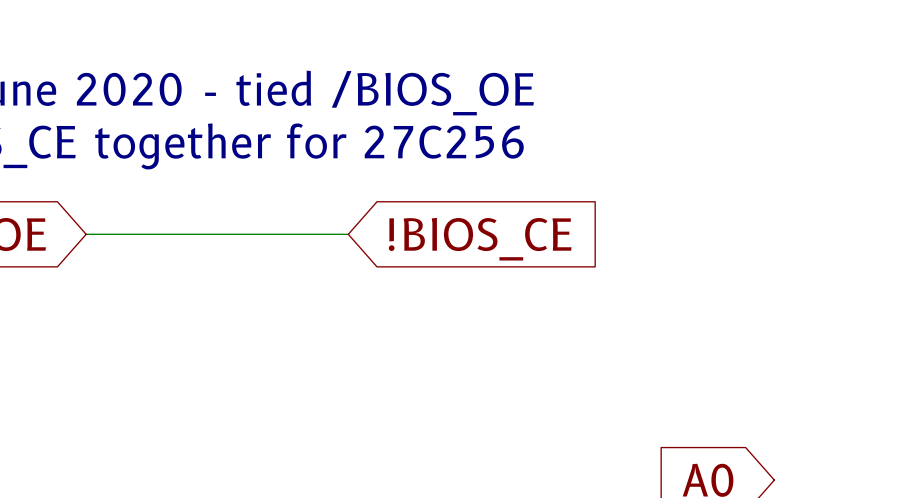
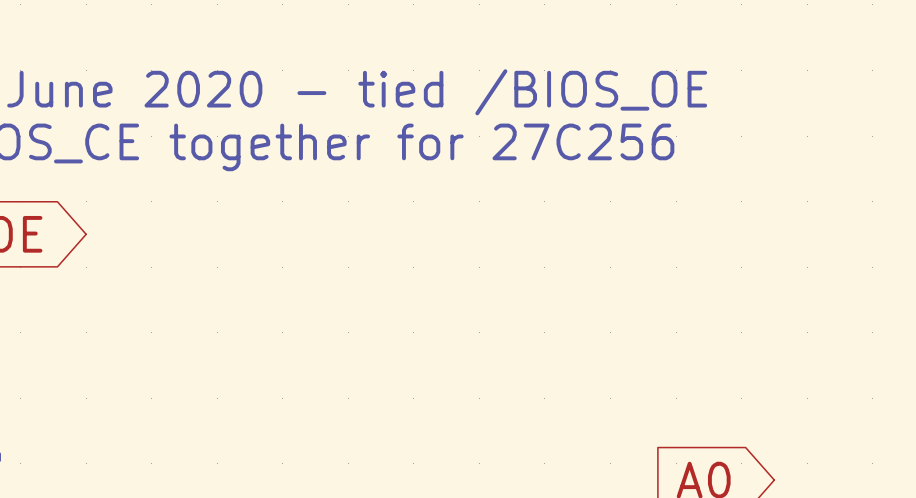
wire: (86, 234) (348, 234) -> none
global label: !BIOS_CE (480, 239) -> none

